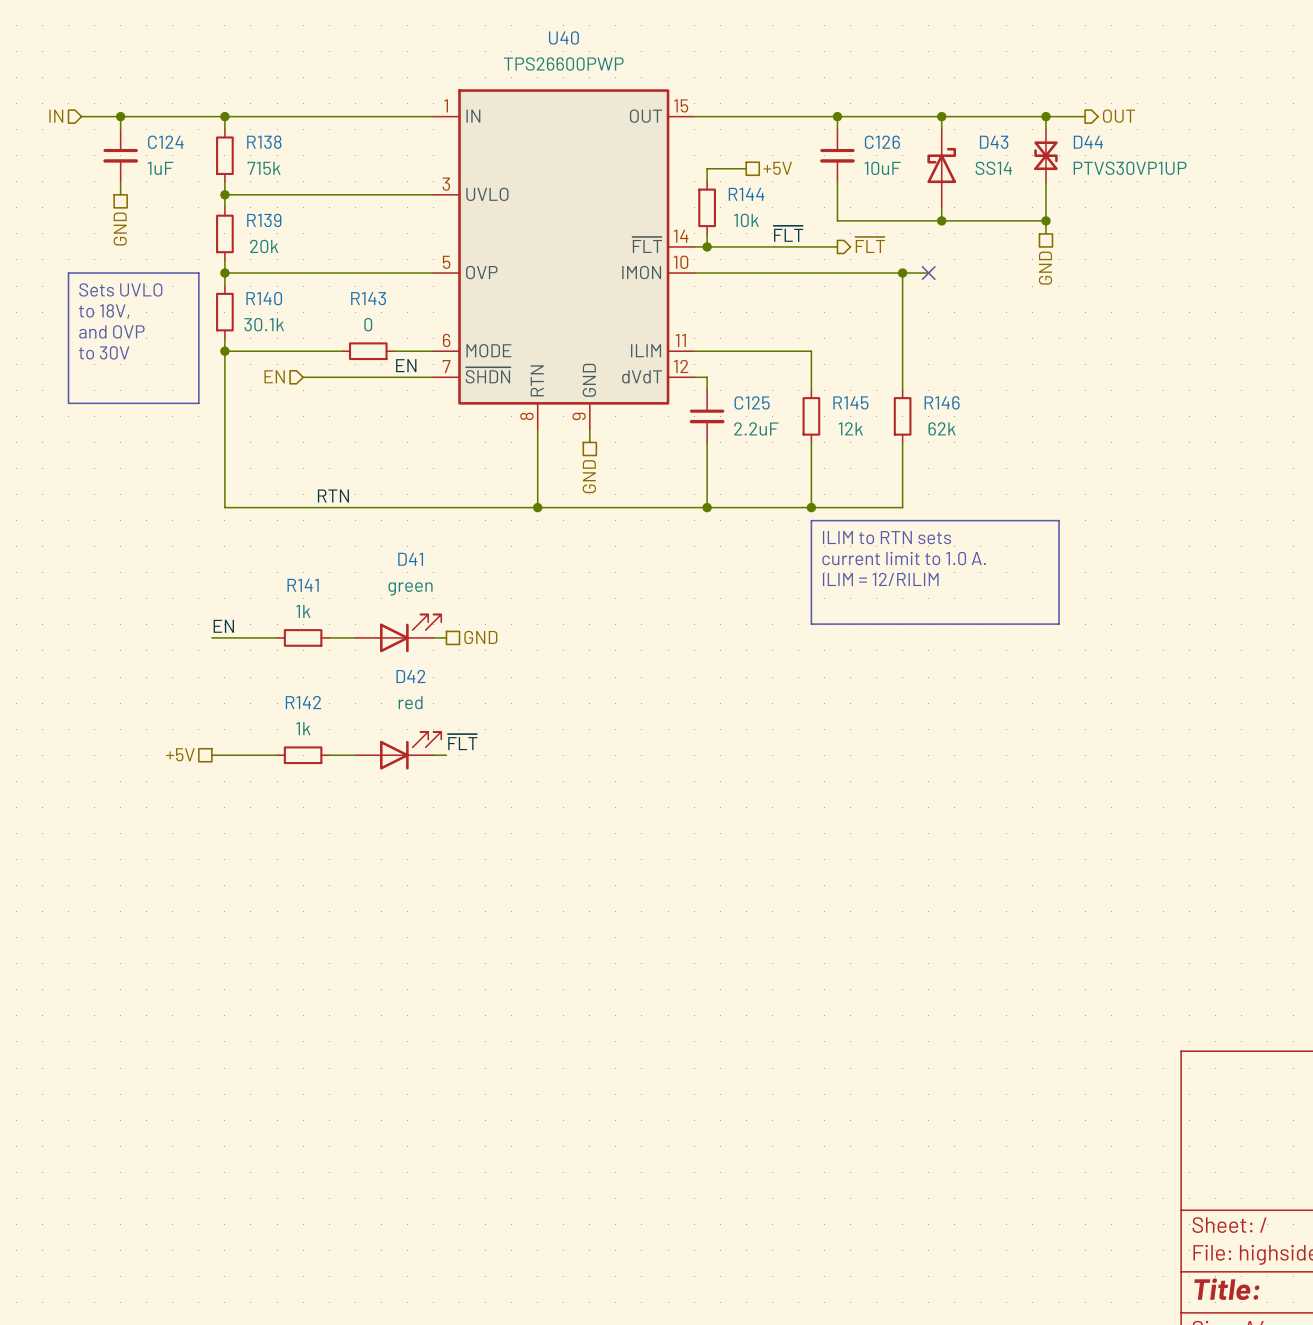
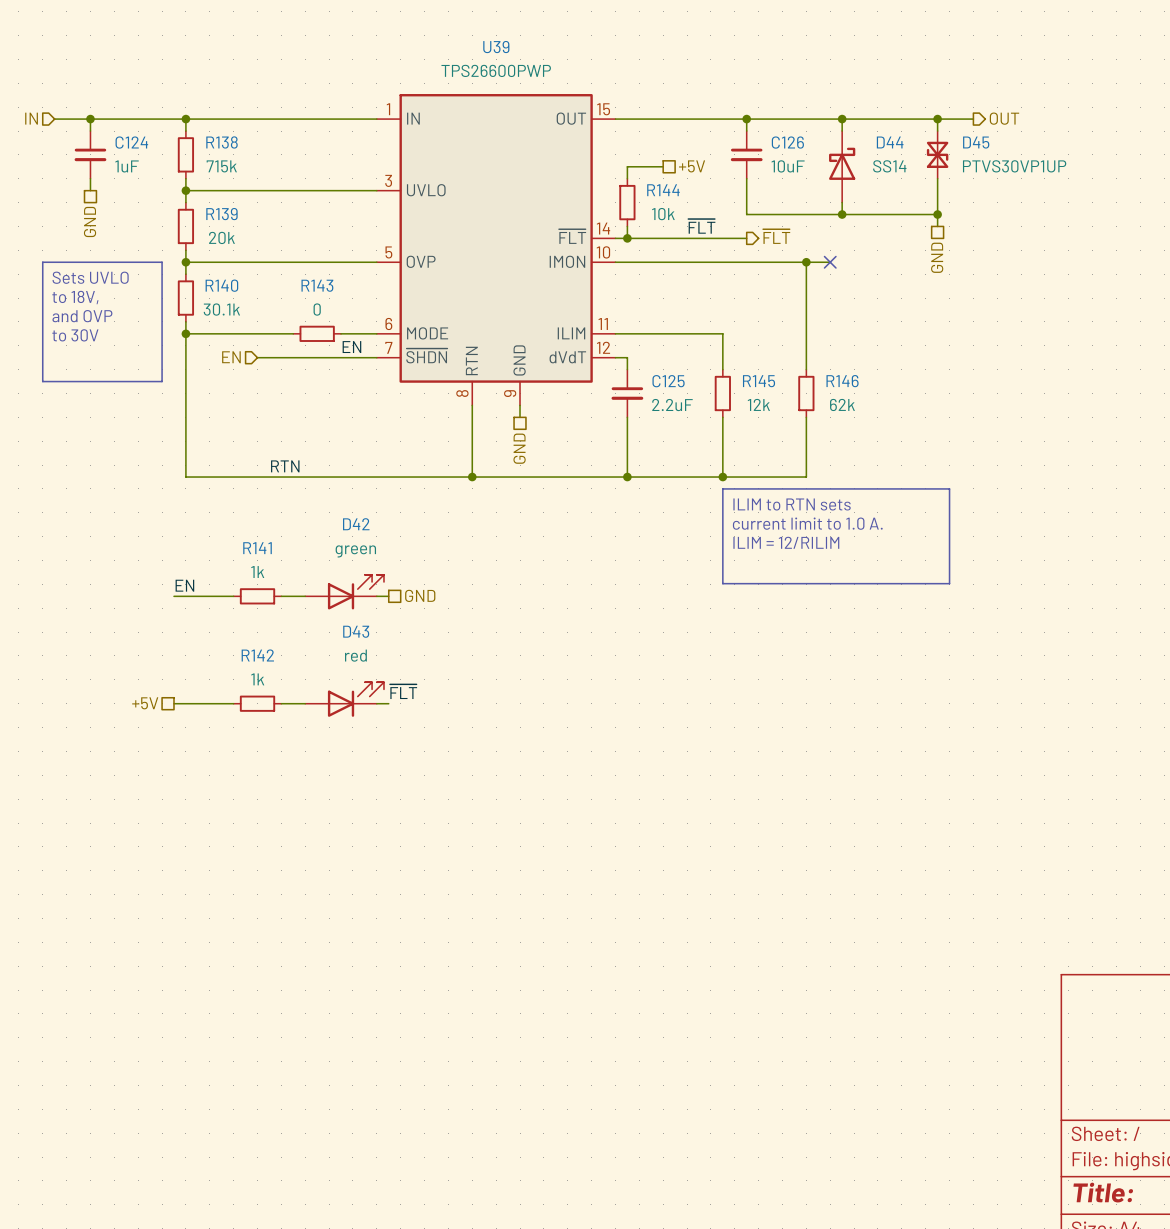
U40 name: U40 (563, 37) -> U39 (496, 47)
D43 name: D43 (994, 142) -> D44 (890, 142)
D44 name: D44 (1088, 142) -> D45 (976, 142)
D41 name: D41 (410, 559) -> D42 (356, 524)
D42 name: D42 (410, 676) -> D43 (356, 631)

